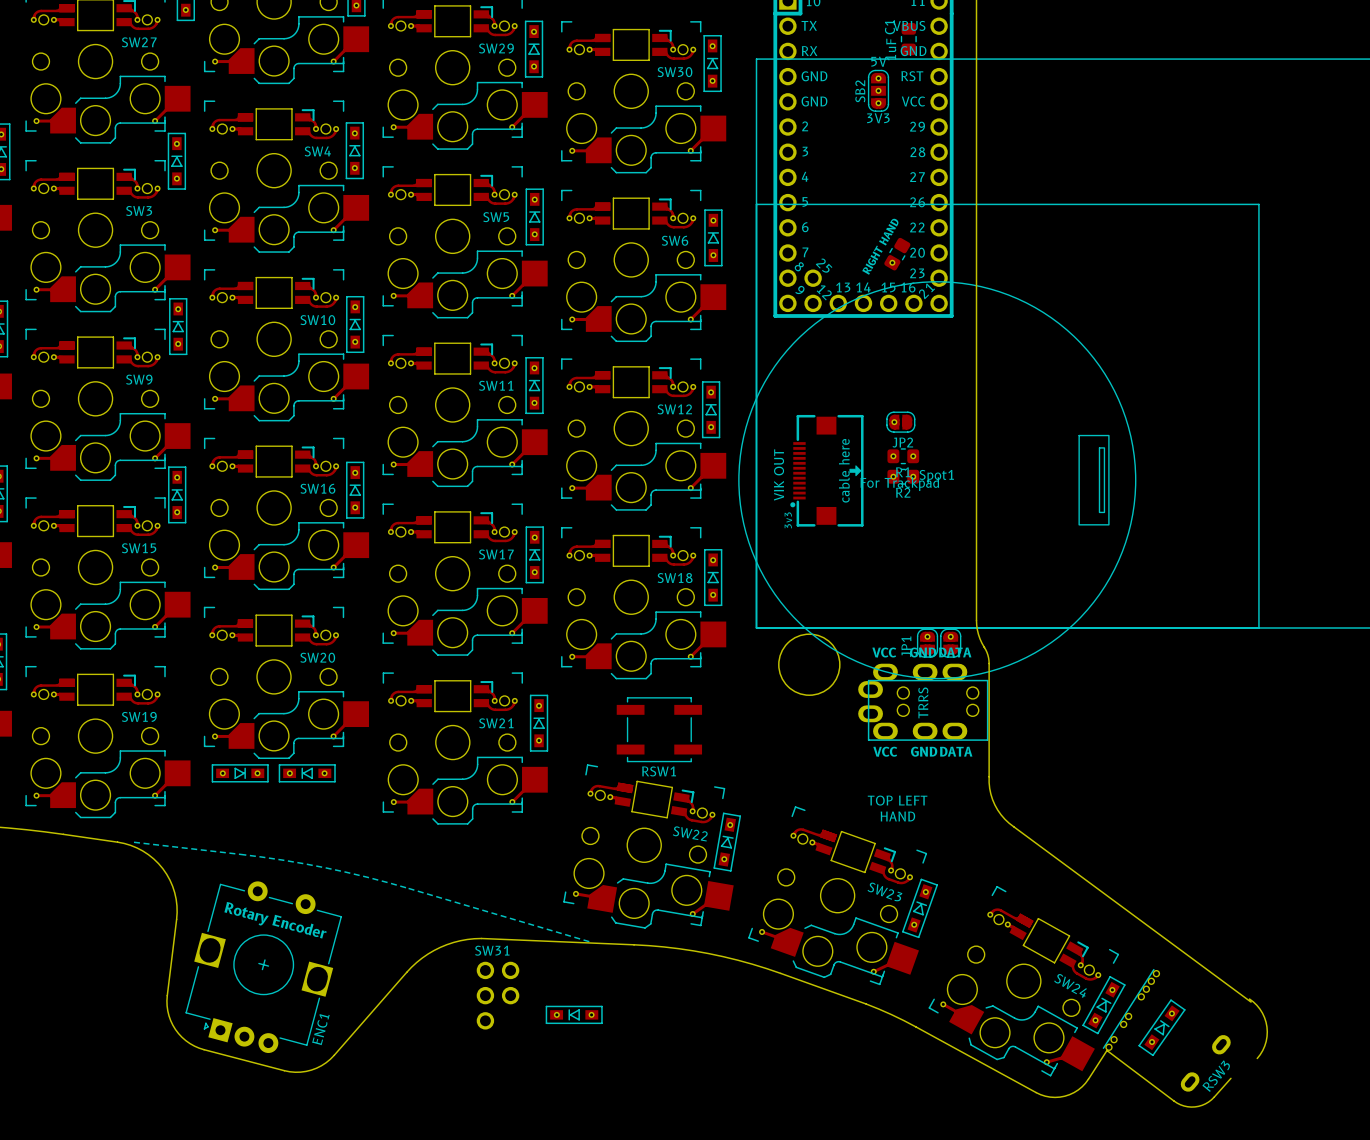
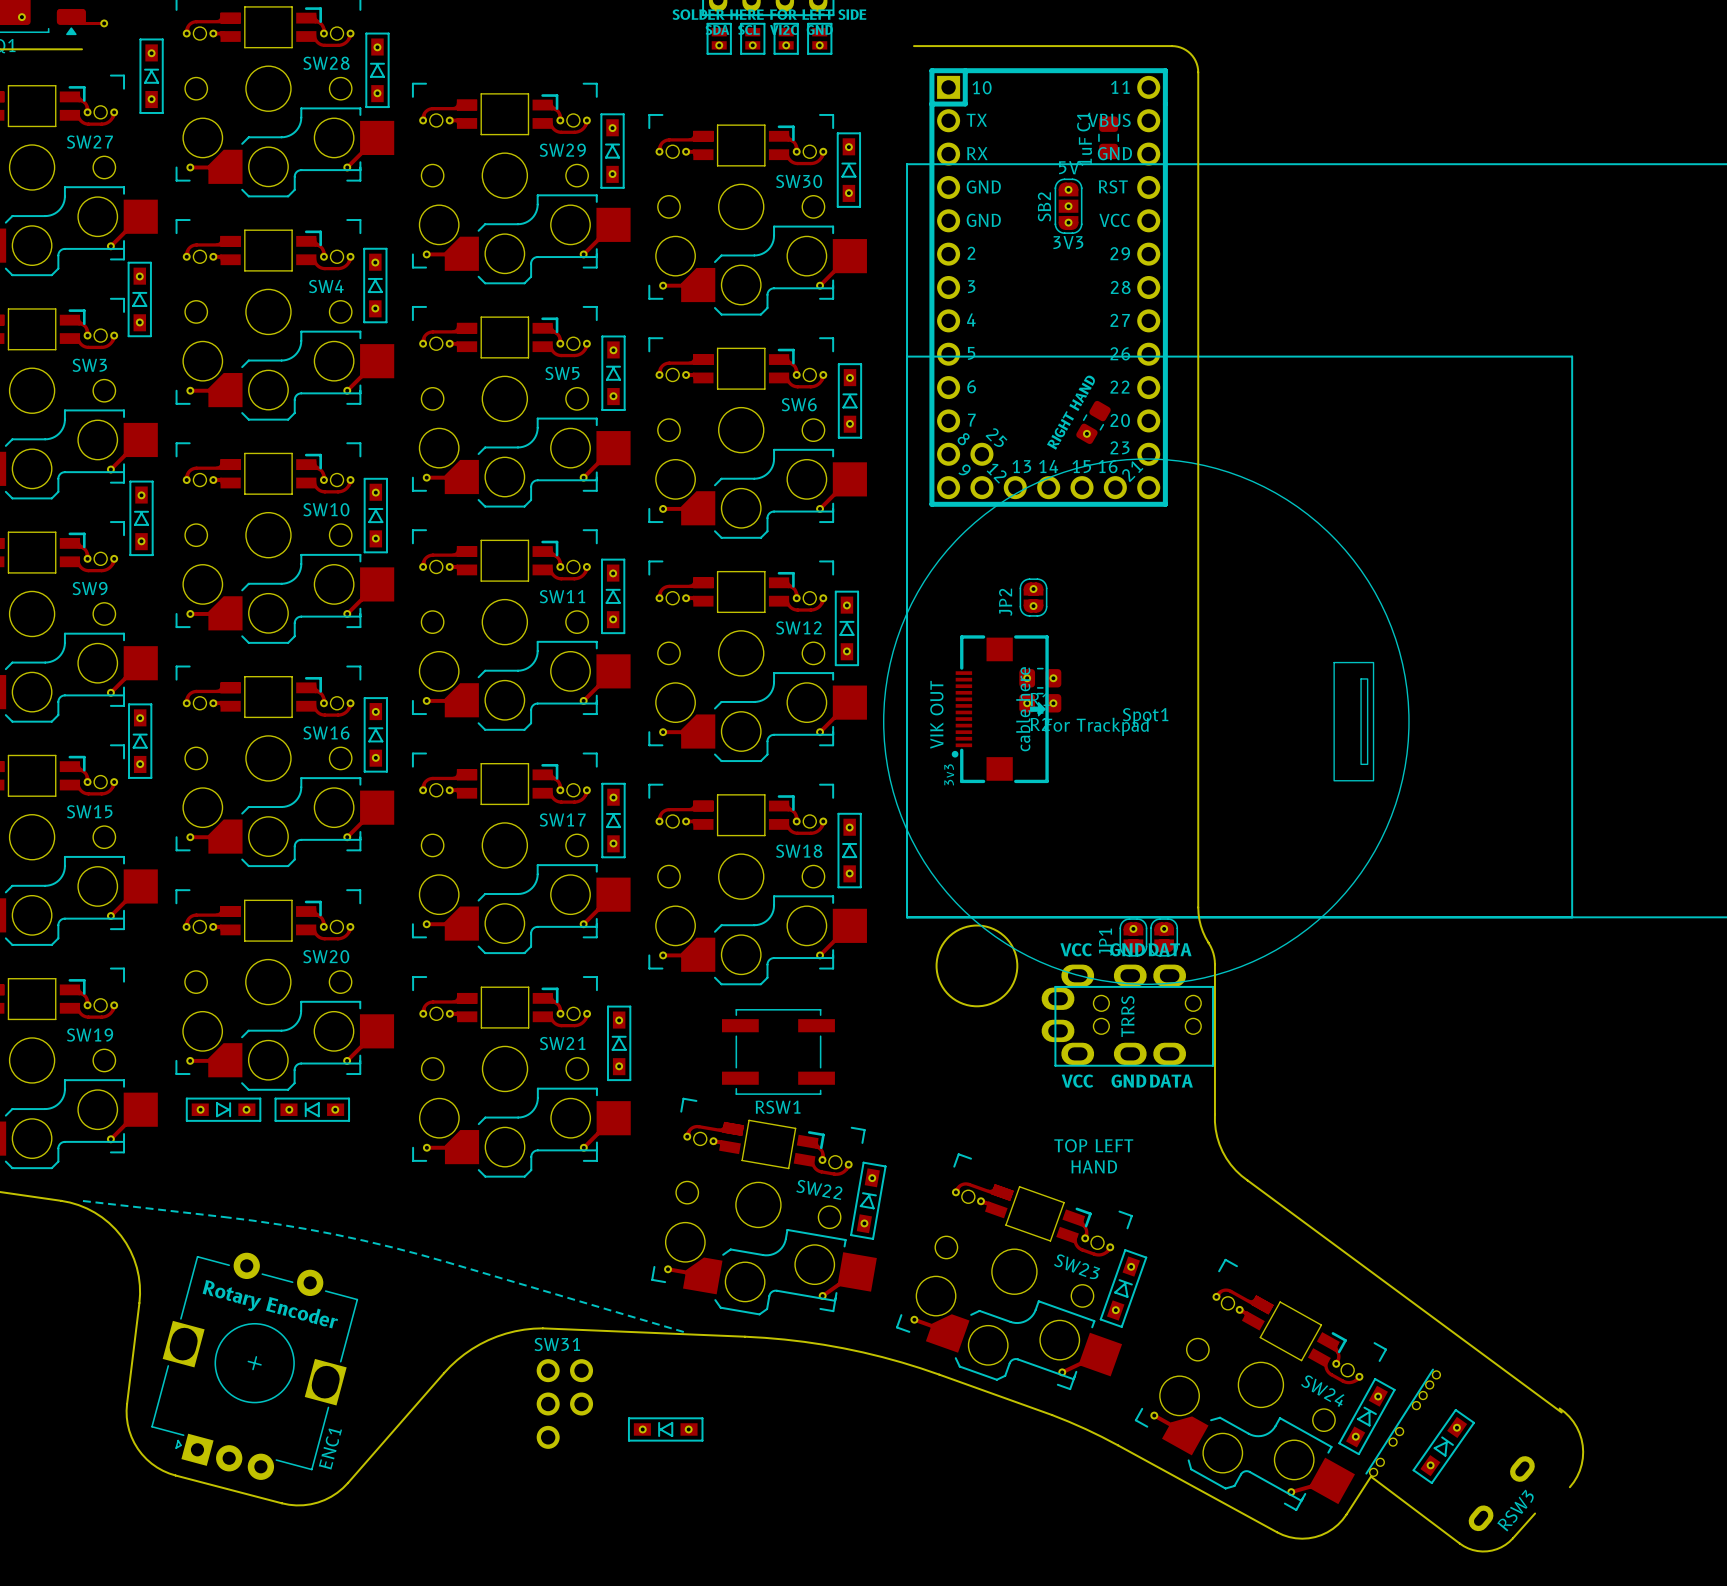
JP2 footprint: [886, 411, 916, 433] -> [1019, 578, 1048, 617]
JP2 name position: JP2 (902, 442) -> JP2 (1005, 602)
R1 position: (903, 456) -> (1040, 678)
R2 position: (903, 476) -> (1040, 703)

